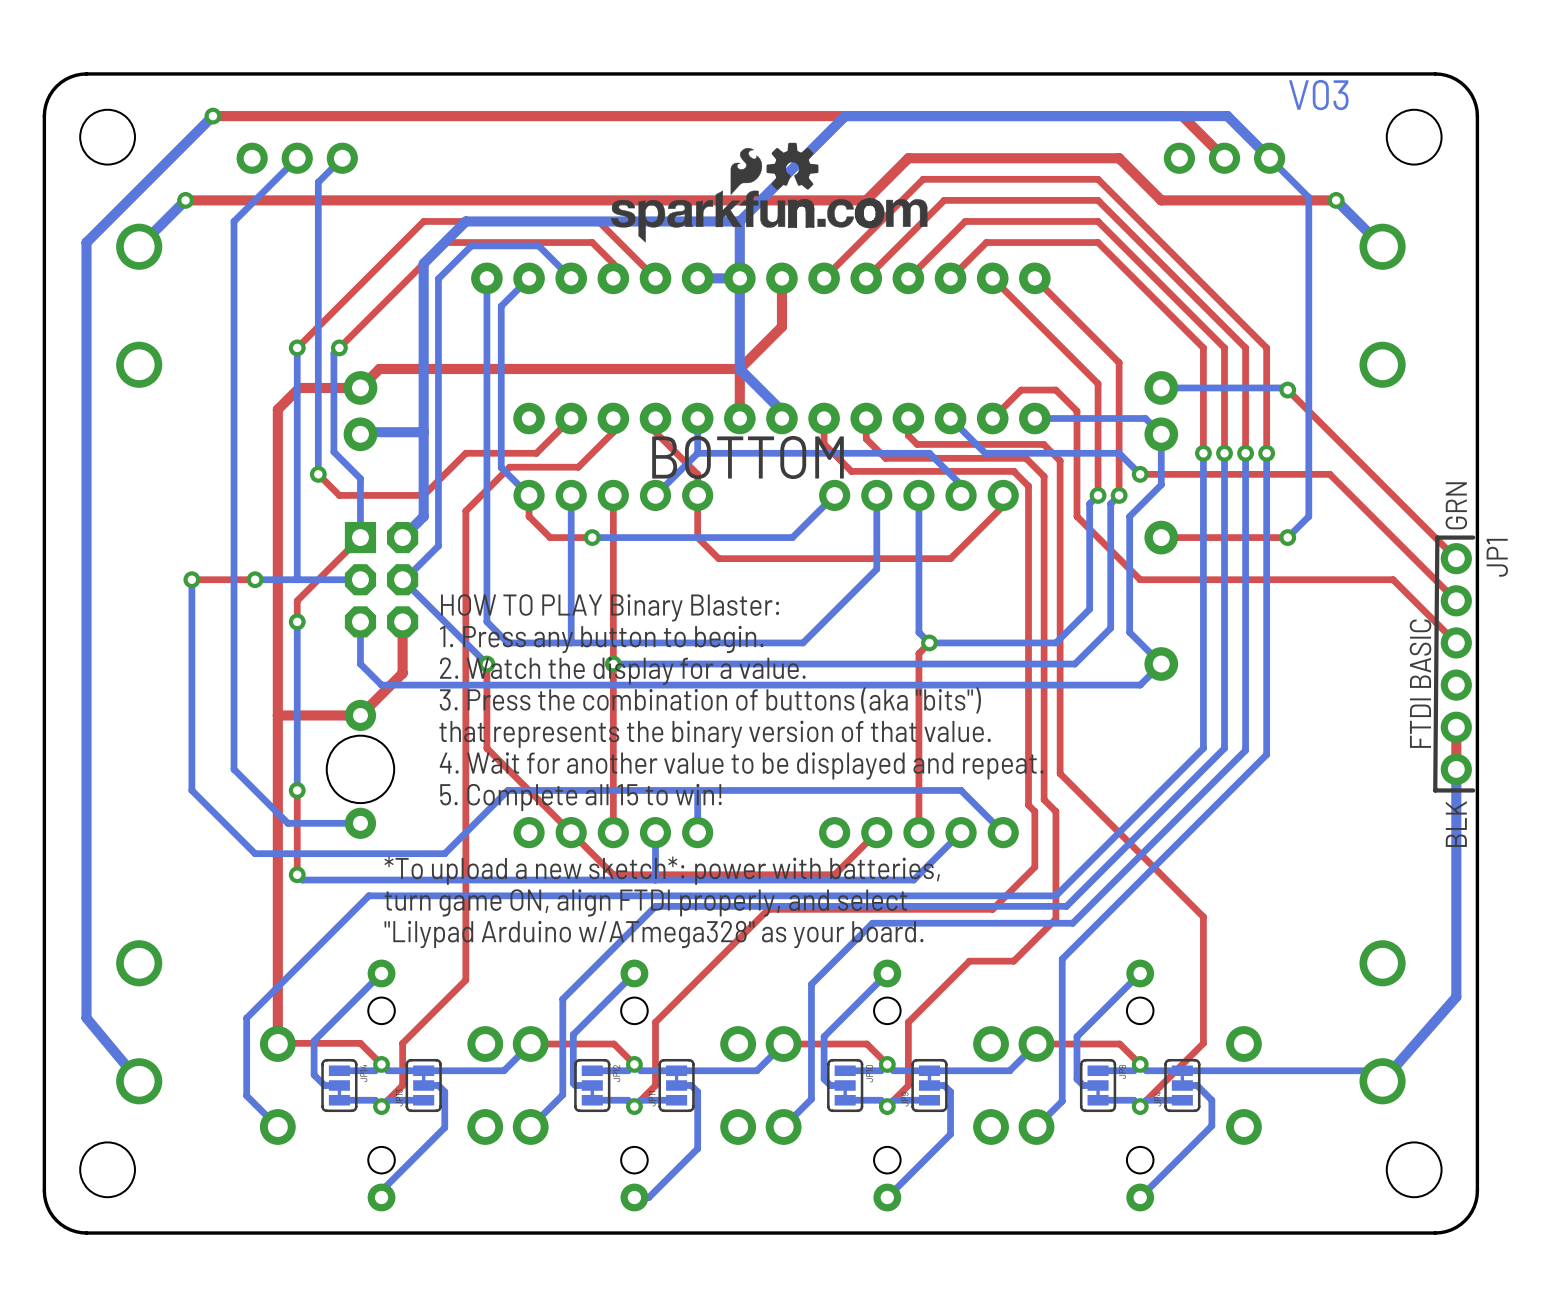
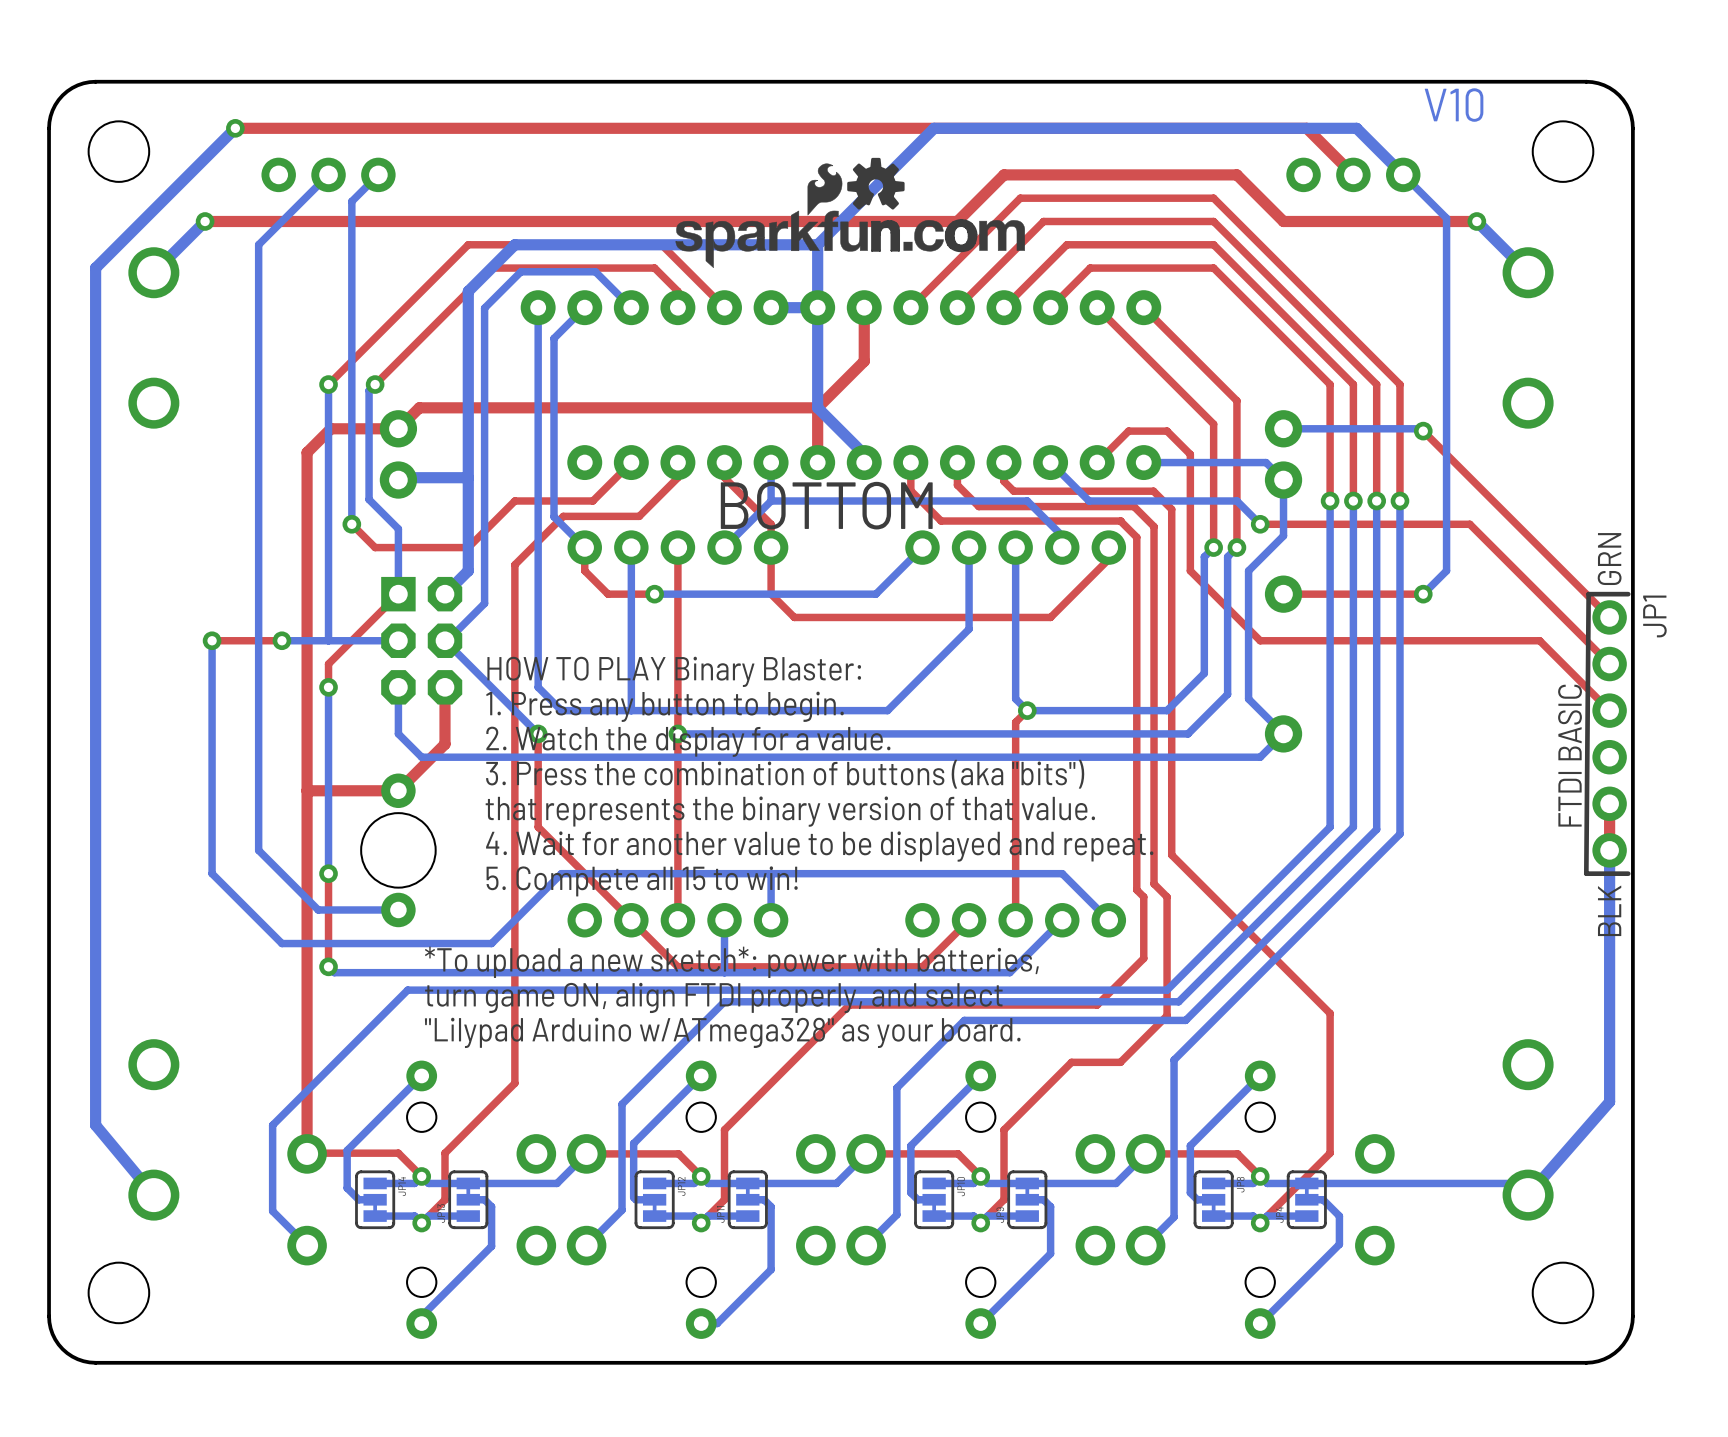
text: V03 (1318, 95) -> V10 (1454, 105)

